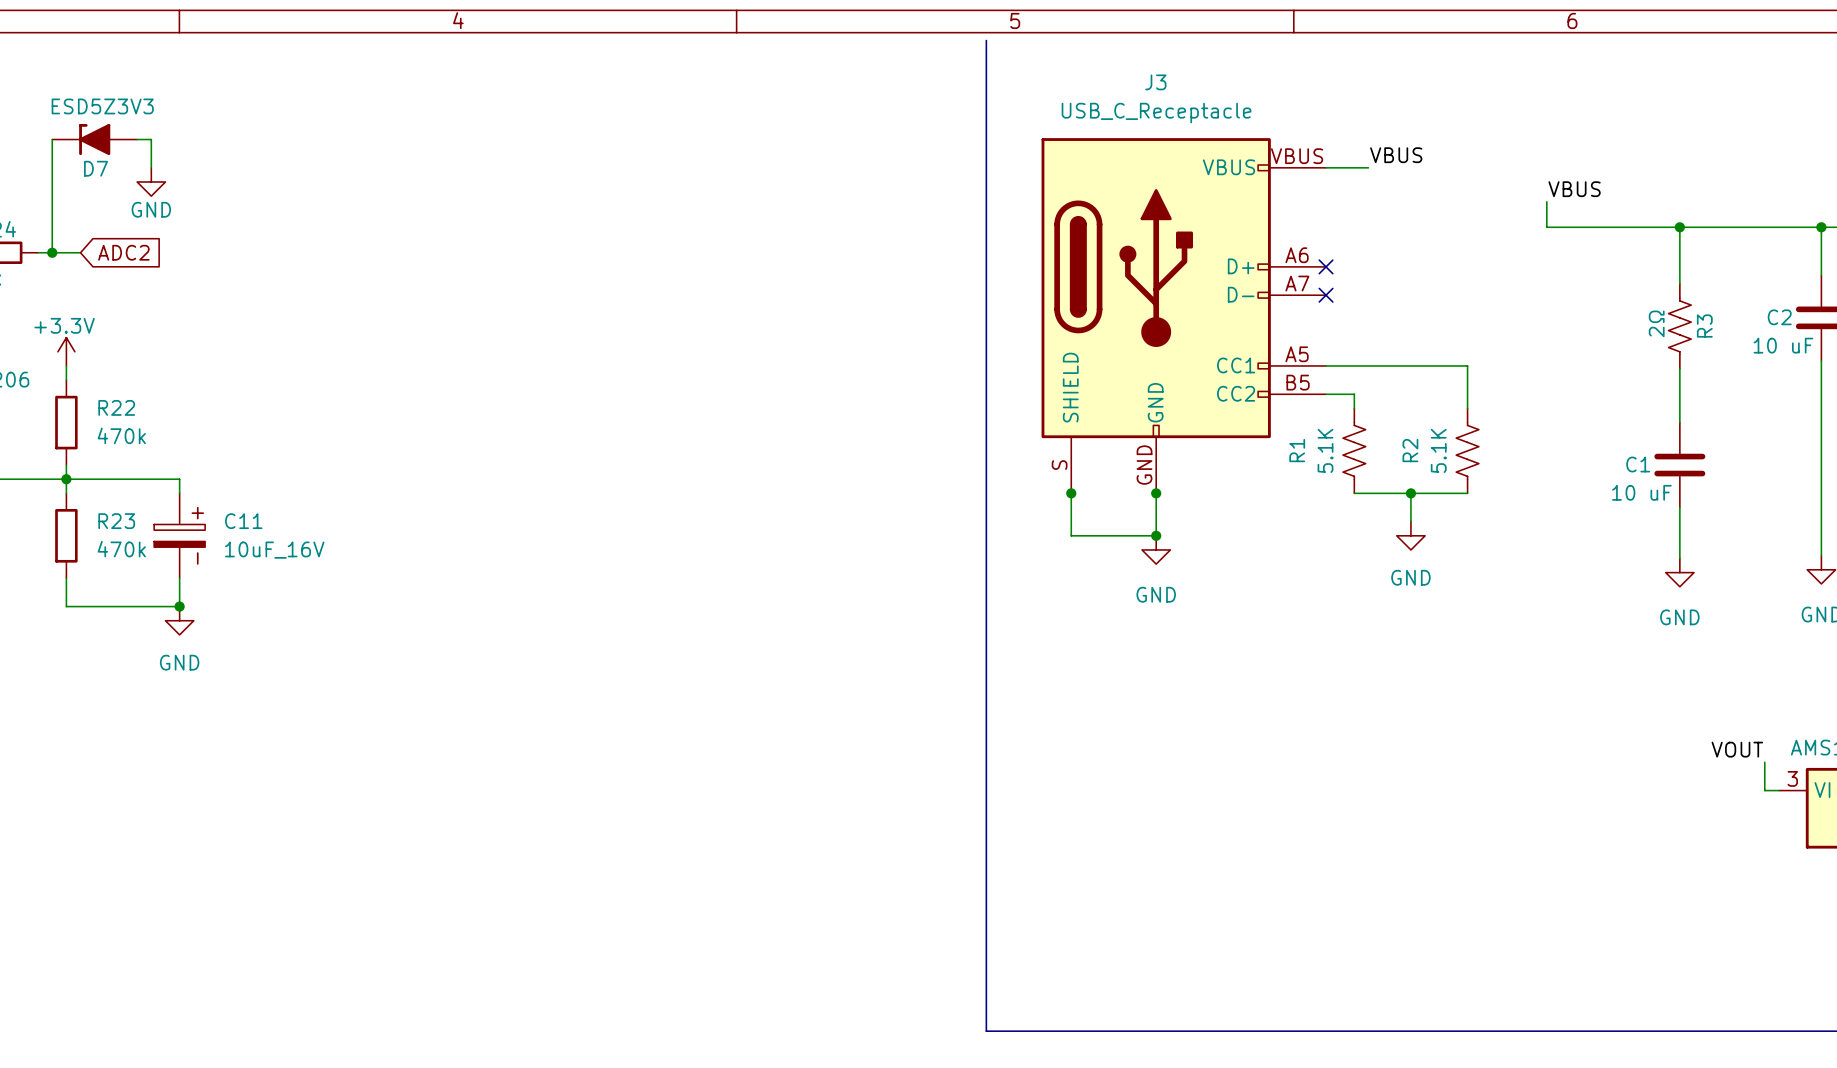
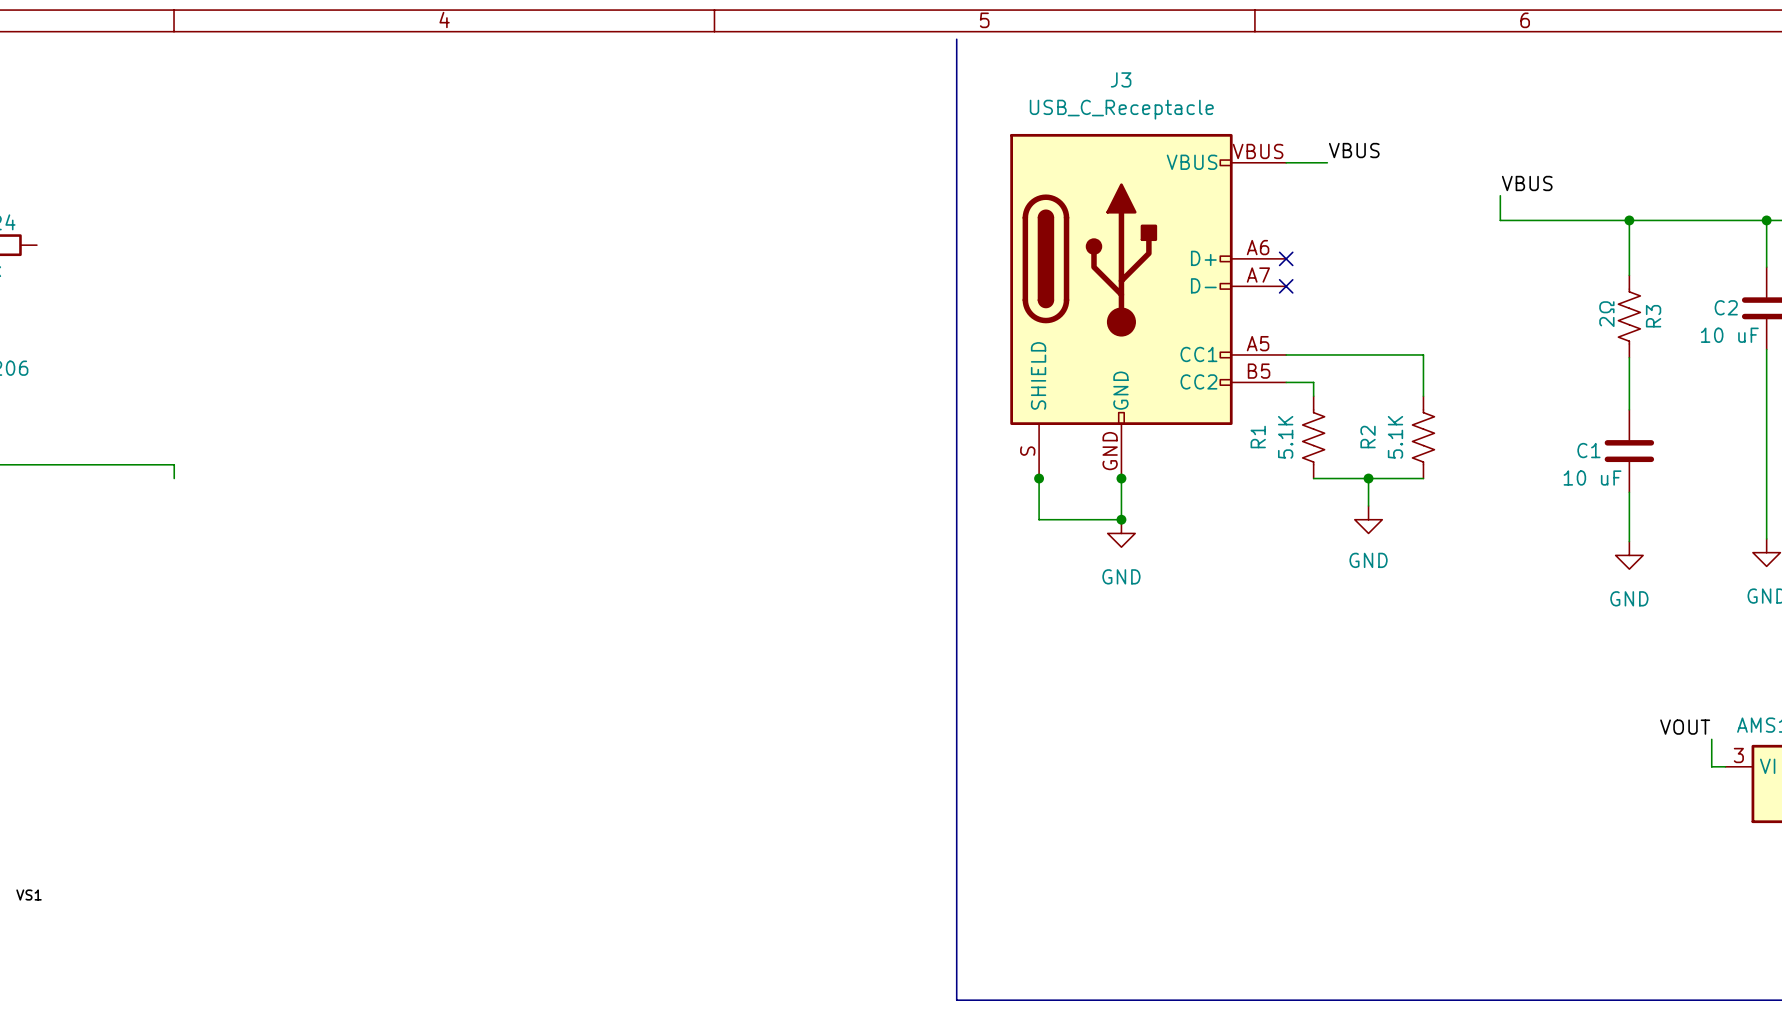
wire: (52, 139) (52, 252) -> none
D7: ESD5Z3V3 (94, 139) -> none
wire: (137, 139) (151, 139) (151, 167) -> none
power symbol: GND (151, 181) -> none
wire: (38, 252) (80, 252) -> none
junction: (52, 252) -> none
global label: ADC2 (123, 252) -> none
power symbol: +3.3V (66, 351) -> none
wire: (66, 365) (66, 380) -> none
R22: 470k (66, 422) -> none
wire: (66, 465) (66, 493) -> none
junction: (66, 479) -> none
R23: 470k (66, 535) -> none
C11: 10uF_16V (179, 535) -> none
wire: (66, 578) (66, 606) (179, 606) (179, 578) -> none
junction: (179, 606) -> none
power symbol: GND (179, 620) -> none
label: none -> VS1 (29, 895)

